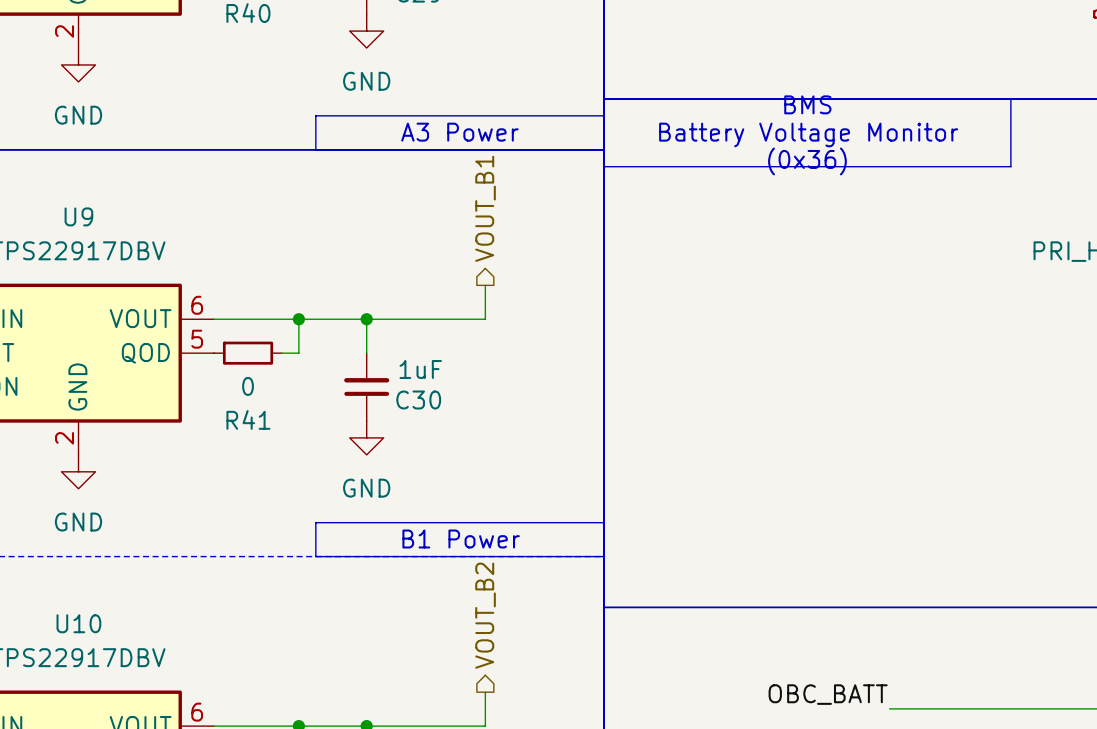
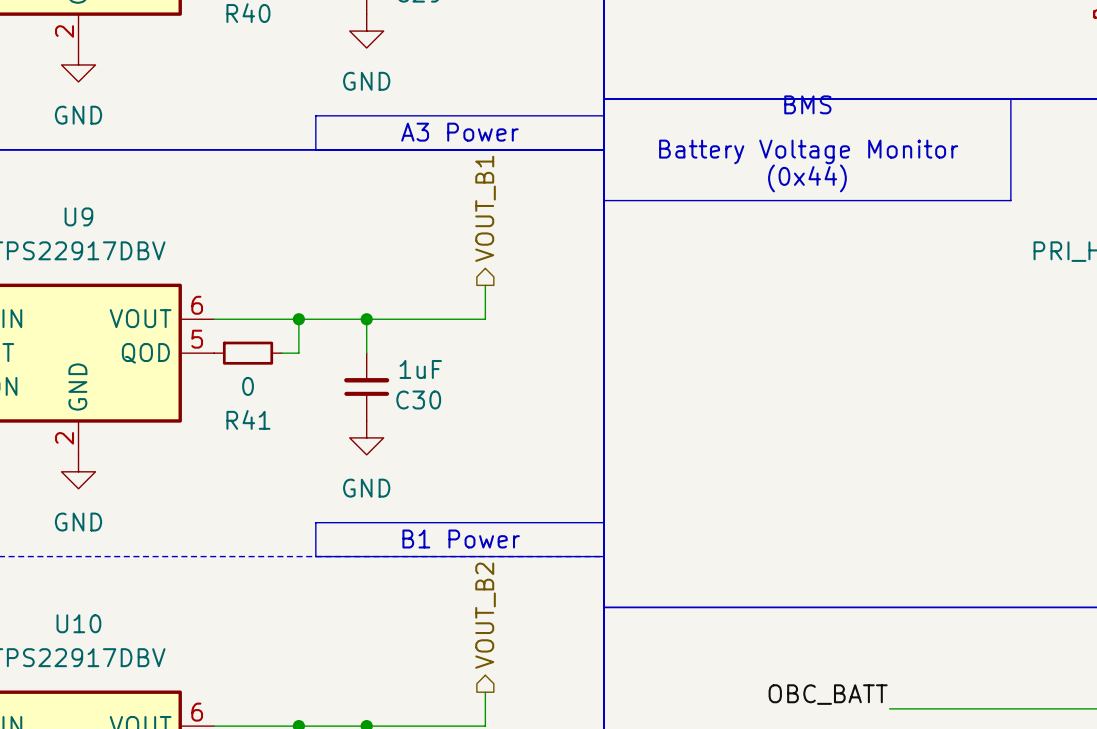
text position: Battery Voltage Monitor (808, 134) -> Battery Voltage Monitor (808, 151)
text: (0x36) (807, 161) -> (0x44) (807, 178)
line: (604, 166) (1010, 166) -> (604, 200) (1010, 200) (1010, 166)

